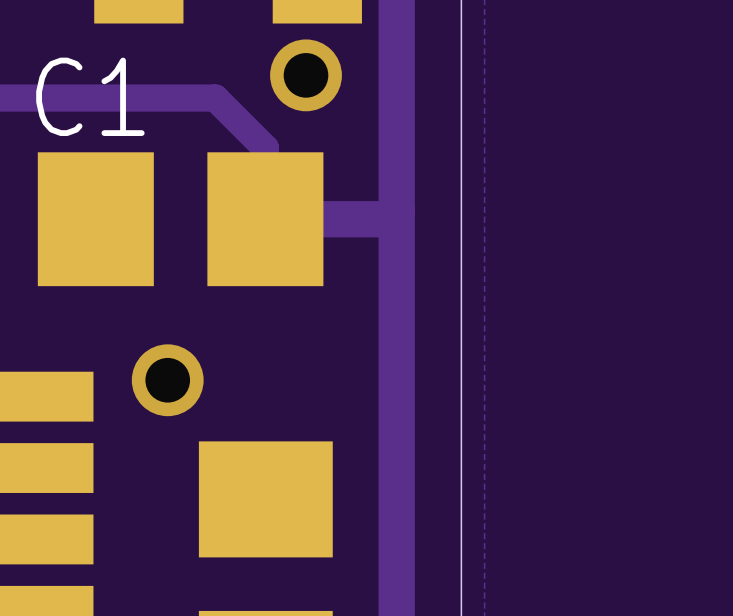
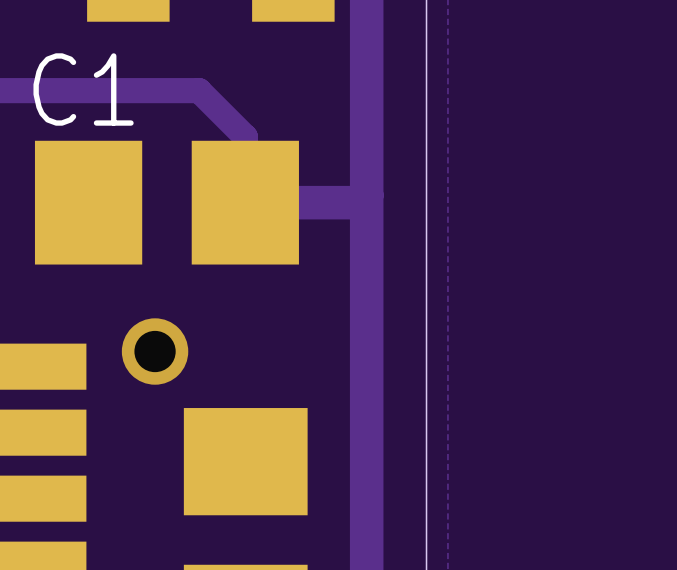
via: (306, 75) -> none

